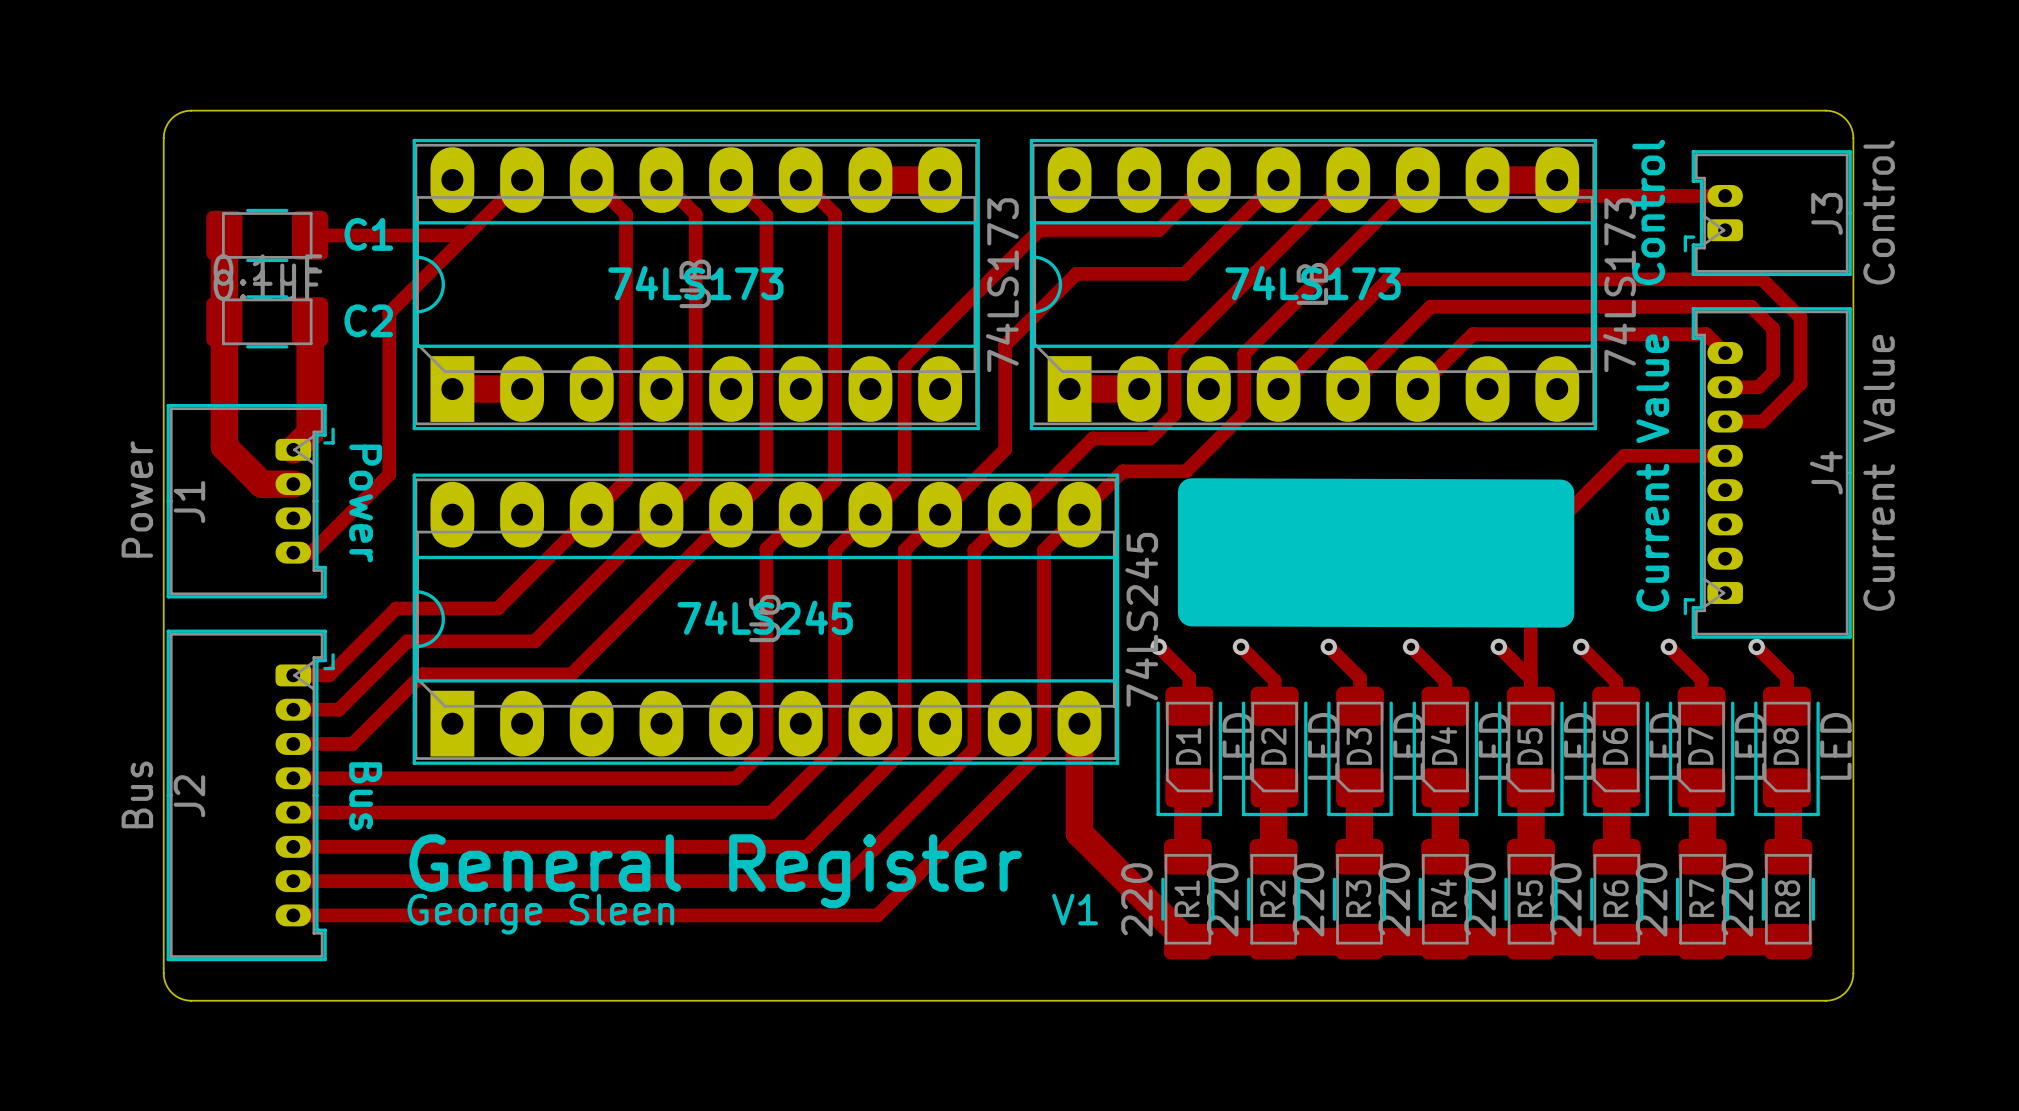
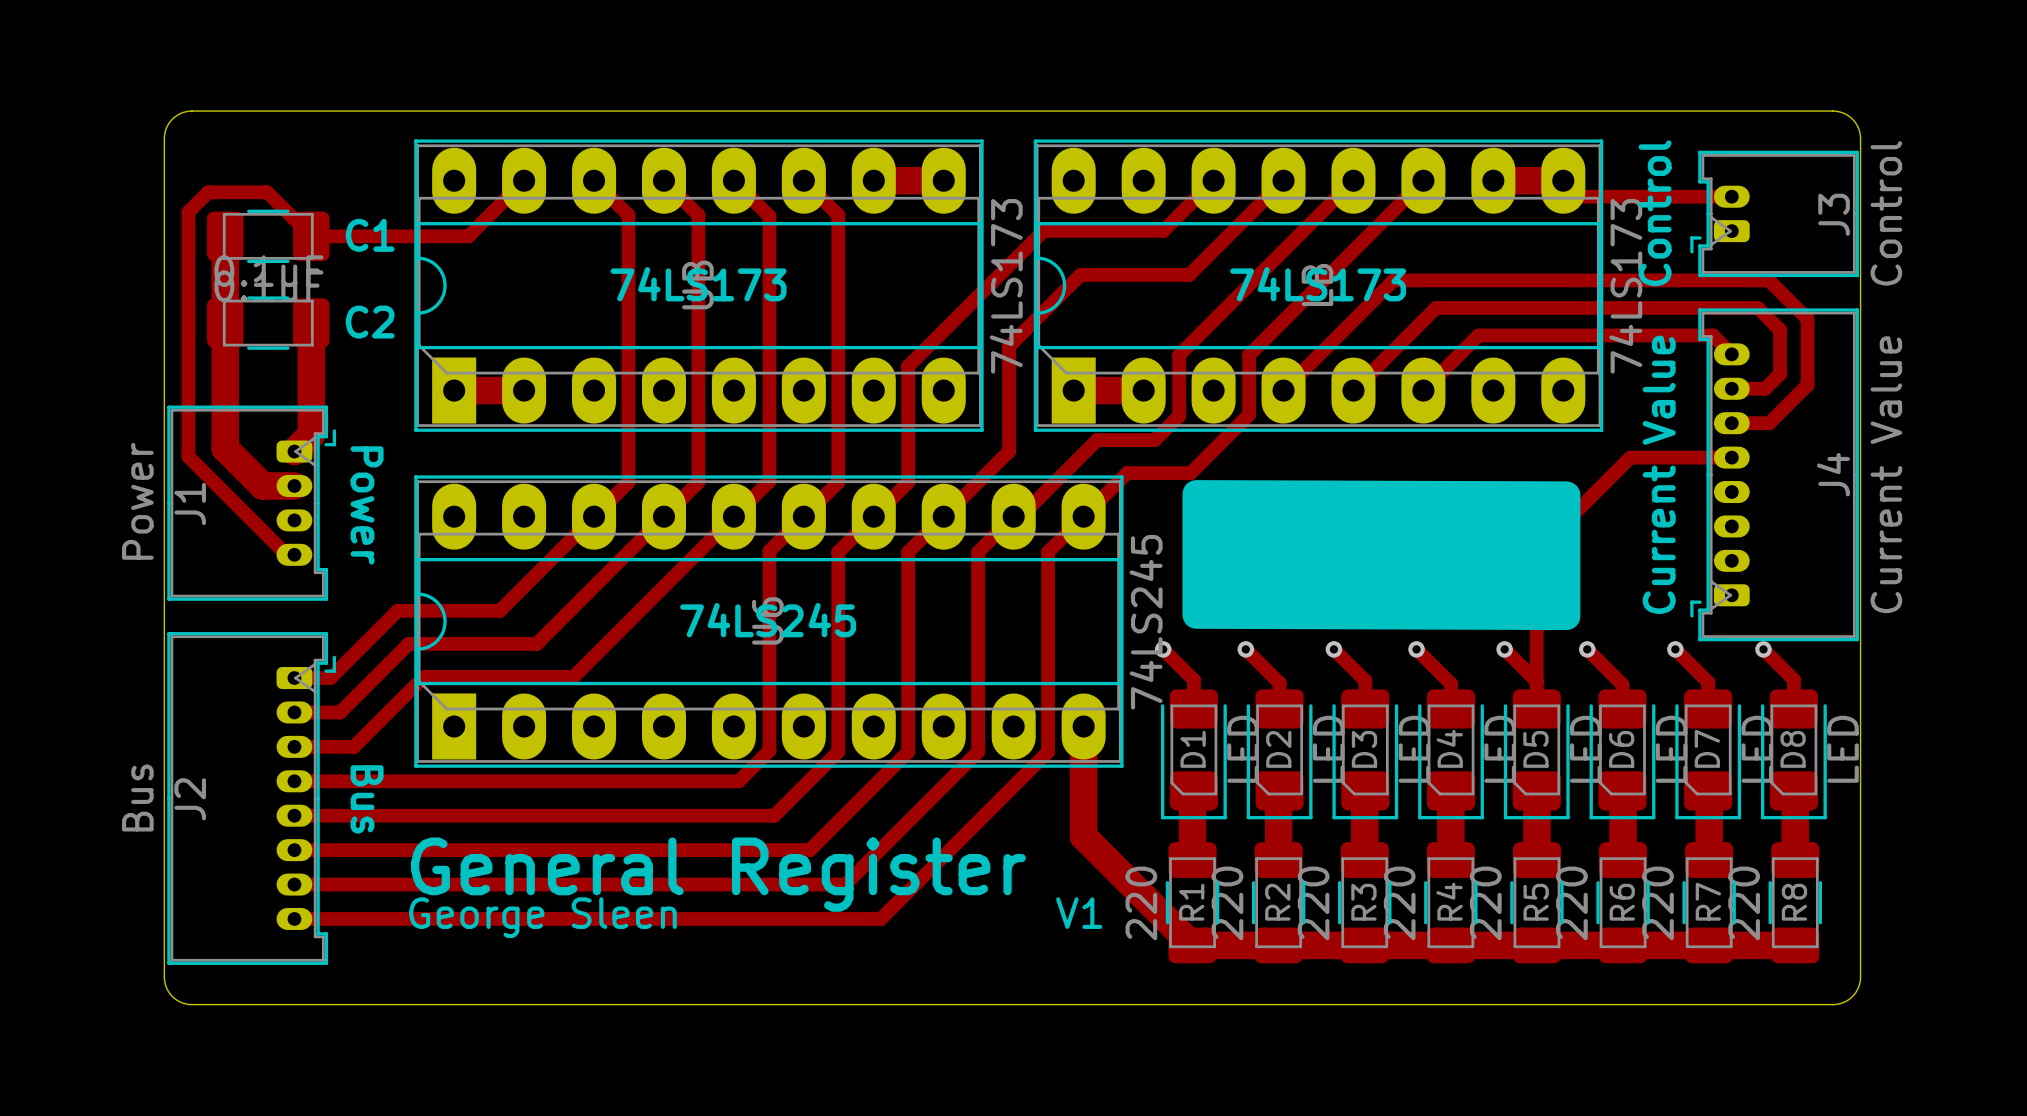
track: none -> (311, 236) (267, 192) (208, 192) (188, 212) (188, 456) (286, 554)
track: (466, 235) (389, 312) (389, 474) (311, 552) (293, 552) -> none

